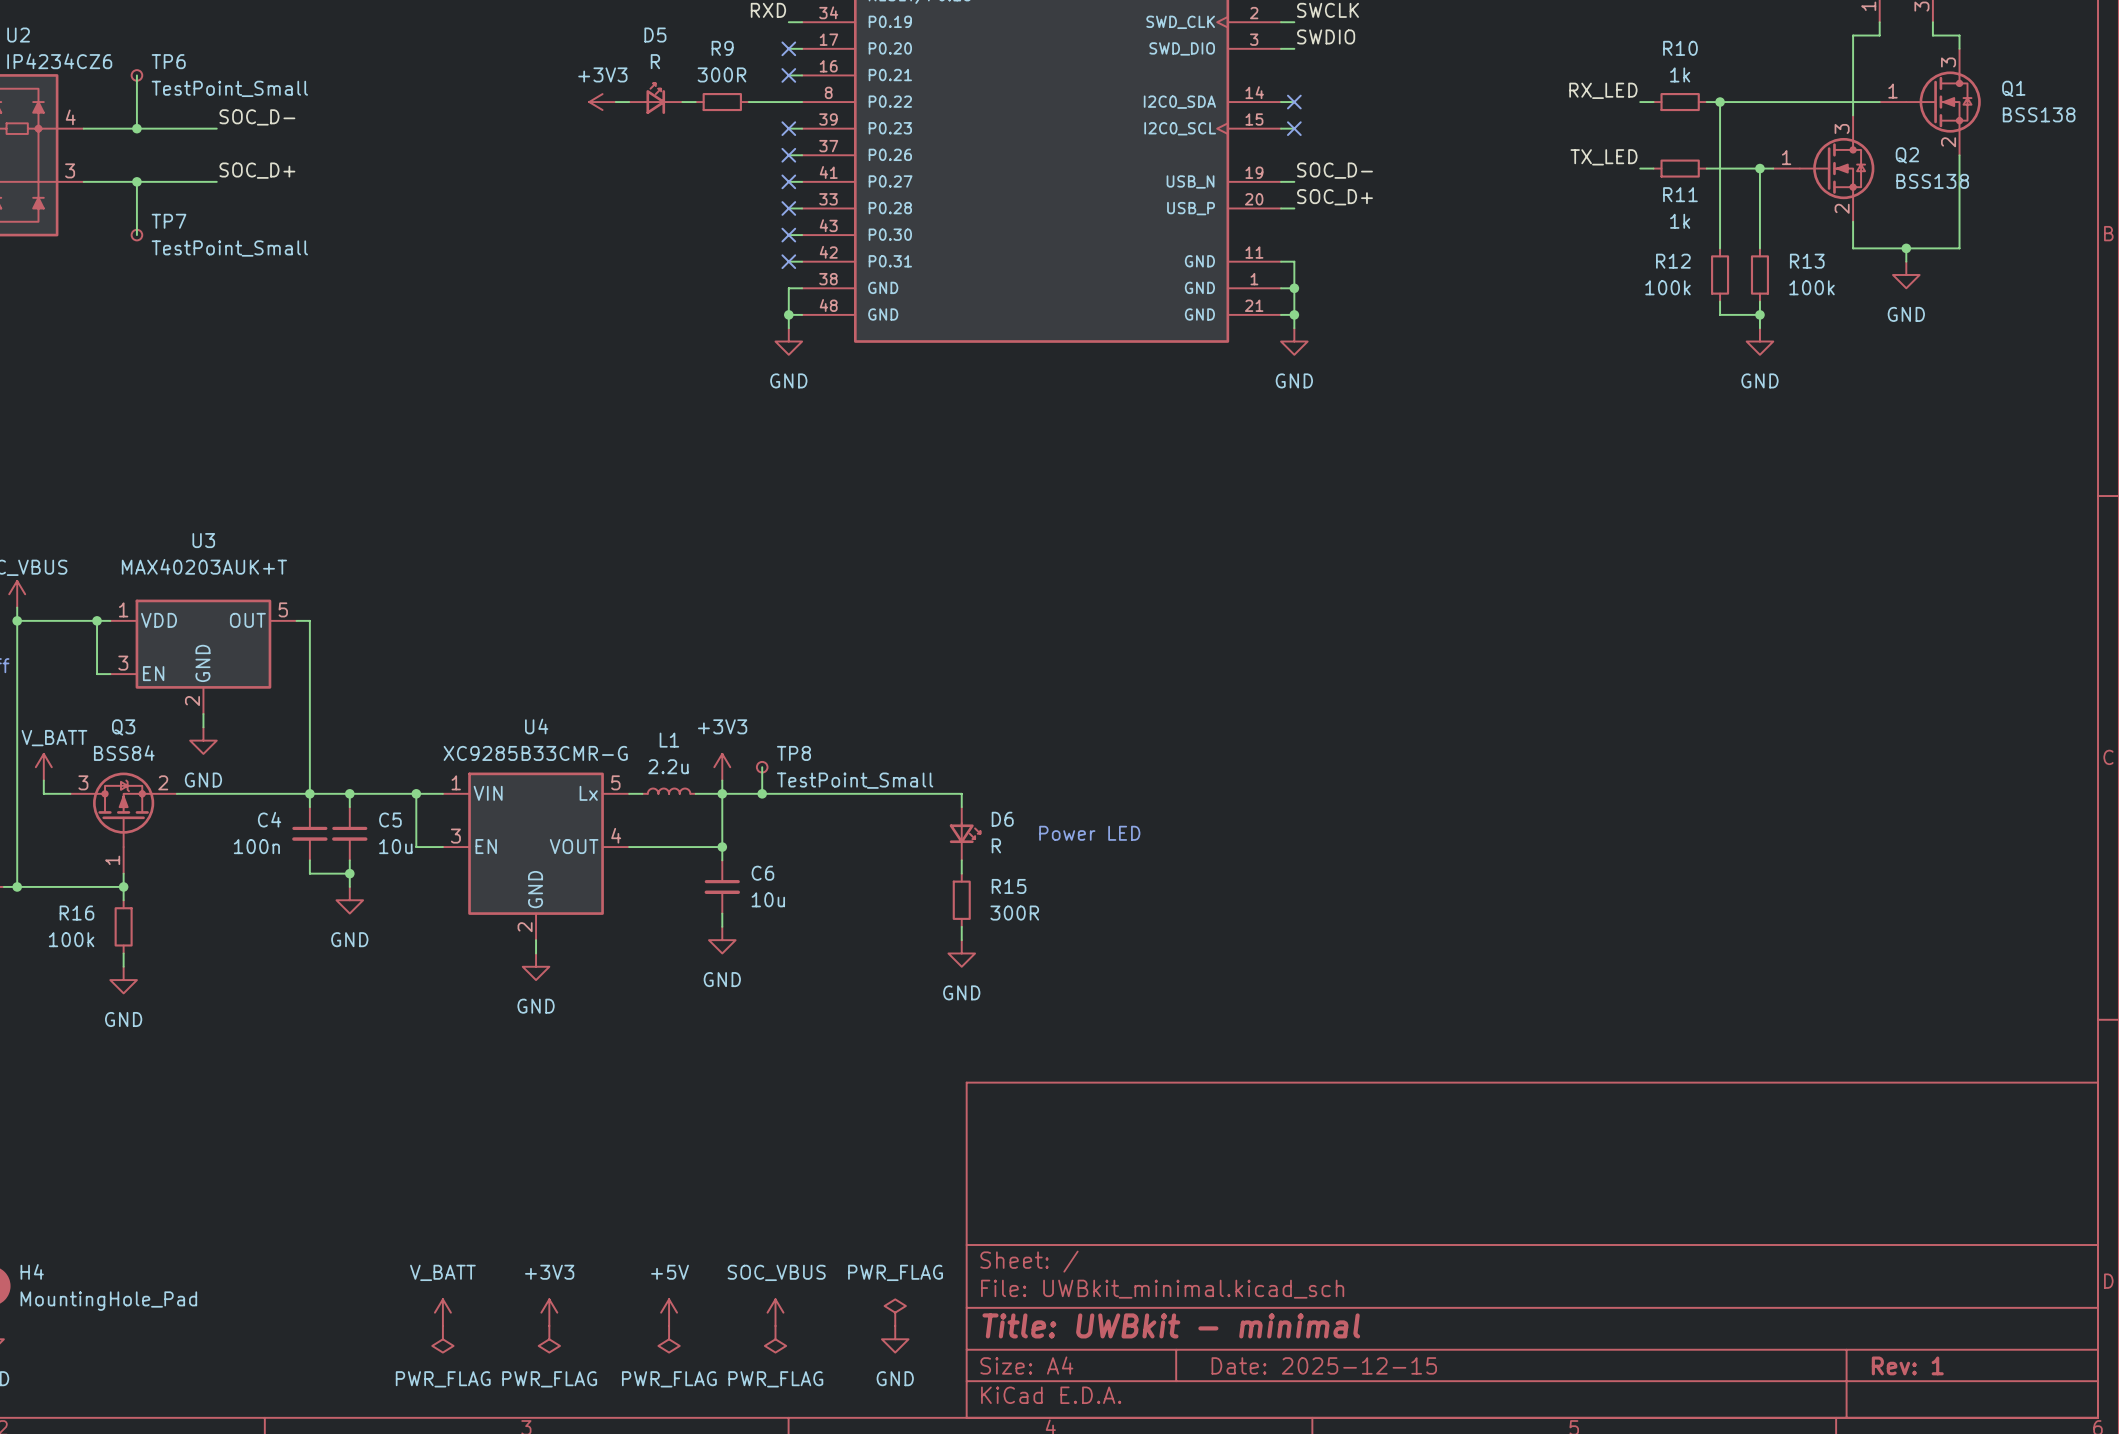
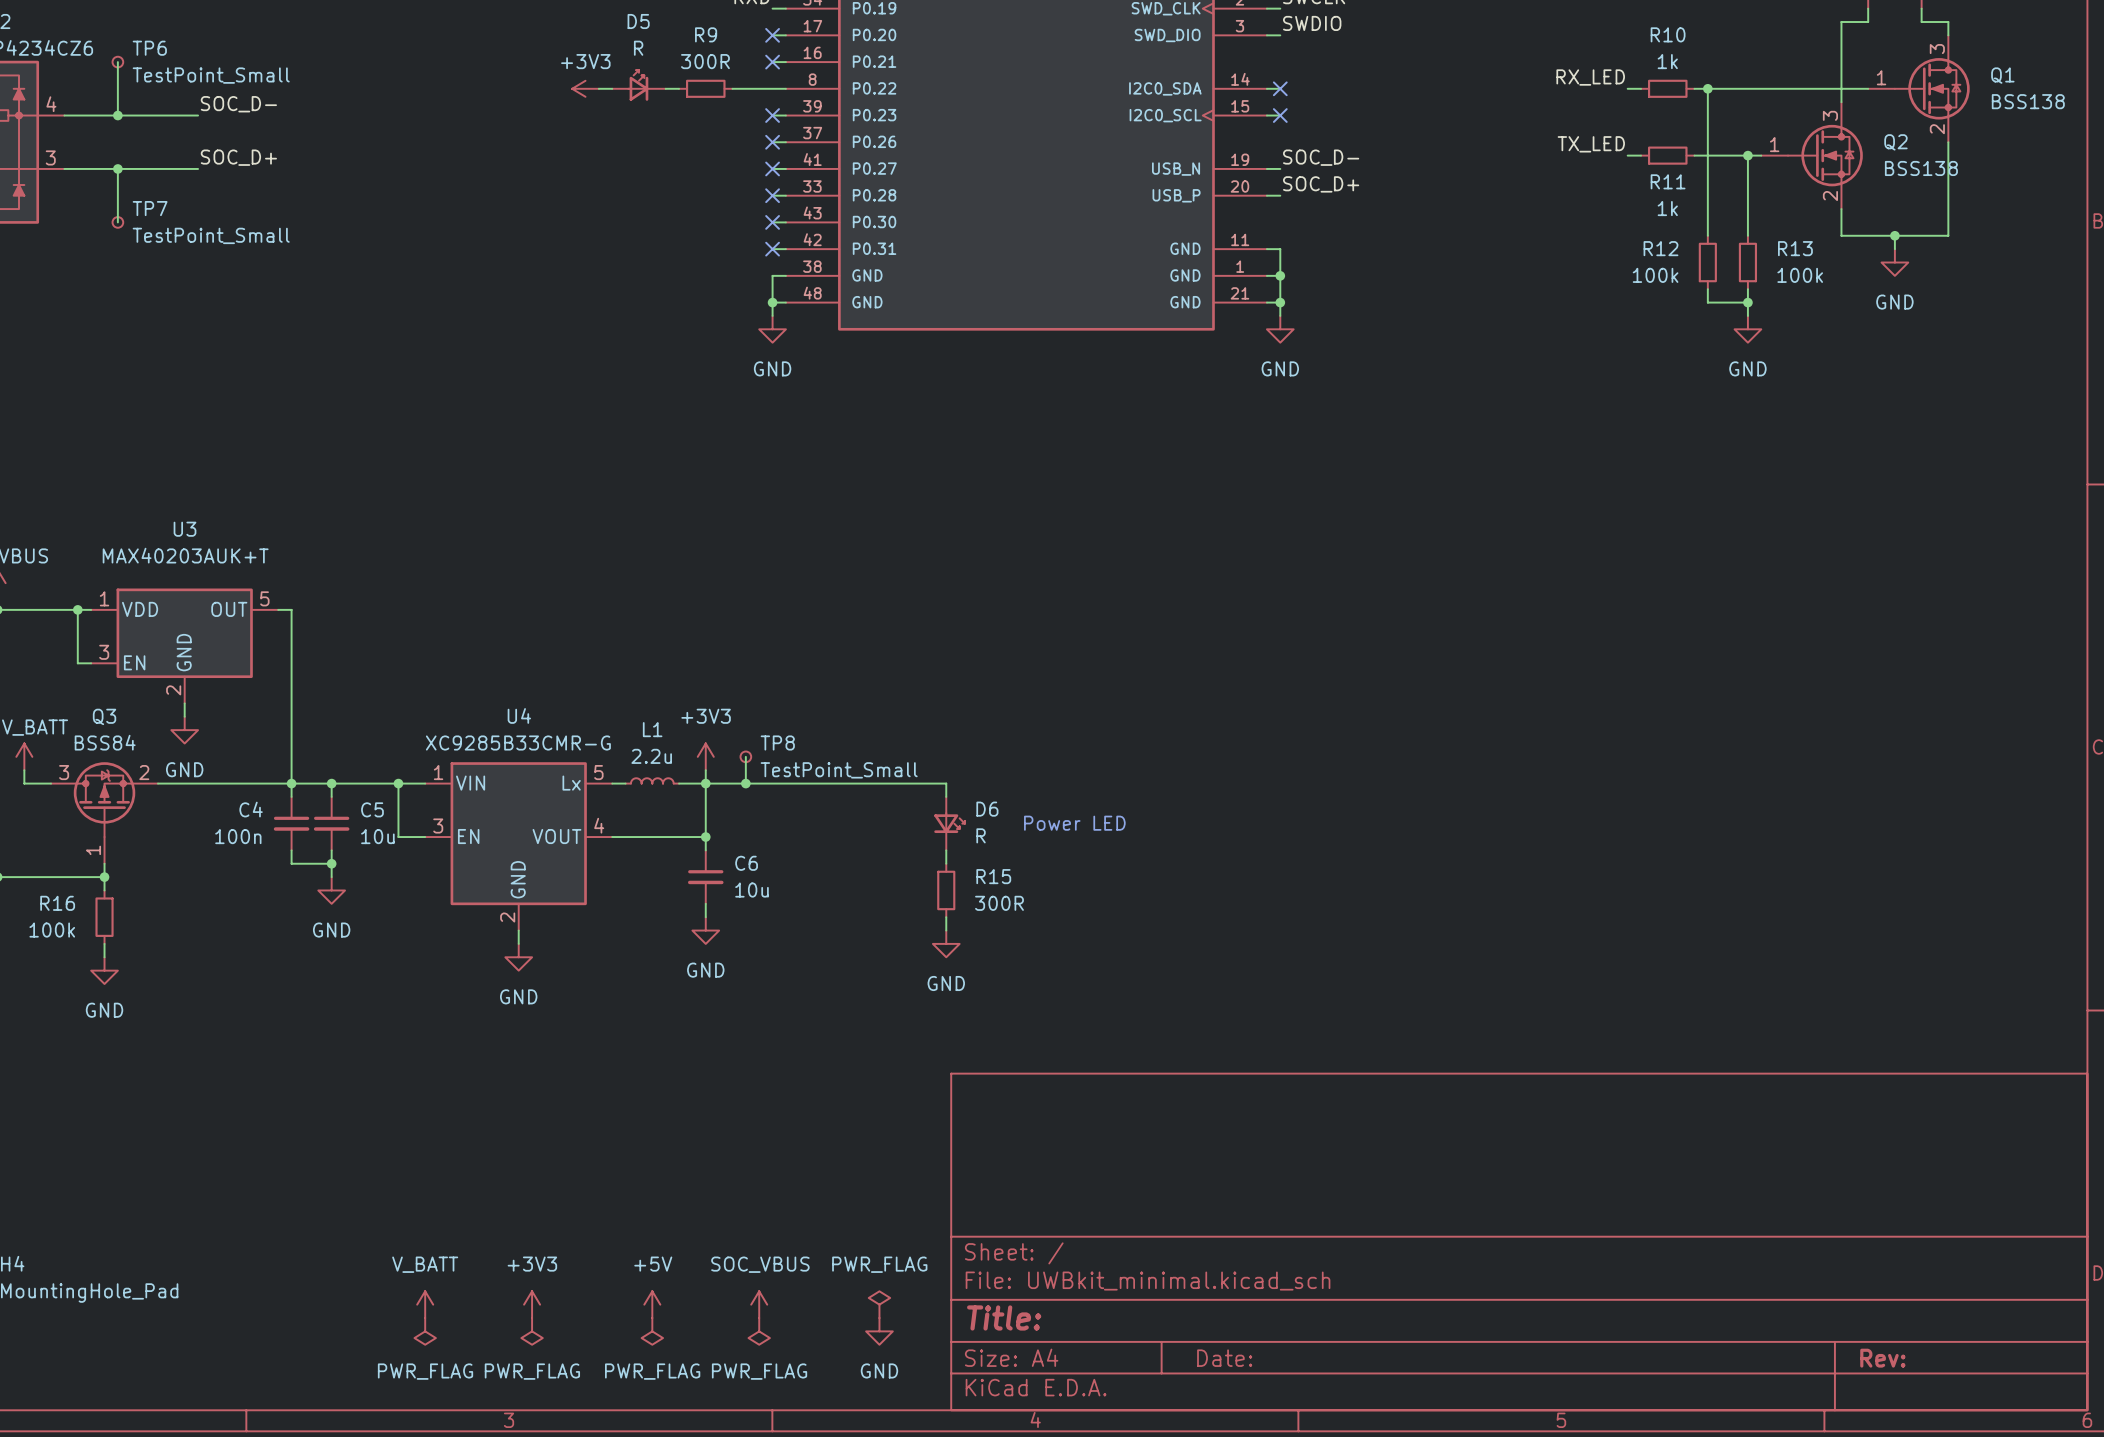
title block: Title: UWBkit - minimal (1171, 1325) -> Title: (1004, 1317)
title block: Date: 2025-12-15 (1324, 1365) -> Date: (1224, 1358)
title block: Rev: 1 (1907, 1365) -> Rev: (1882, 1358)

